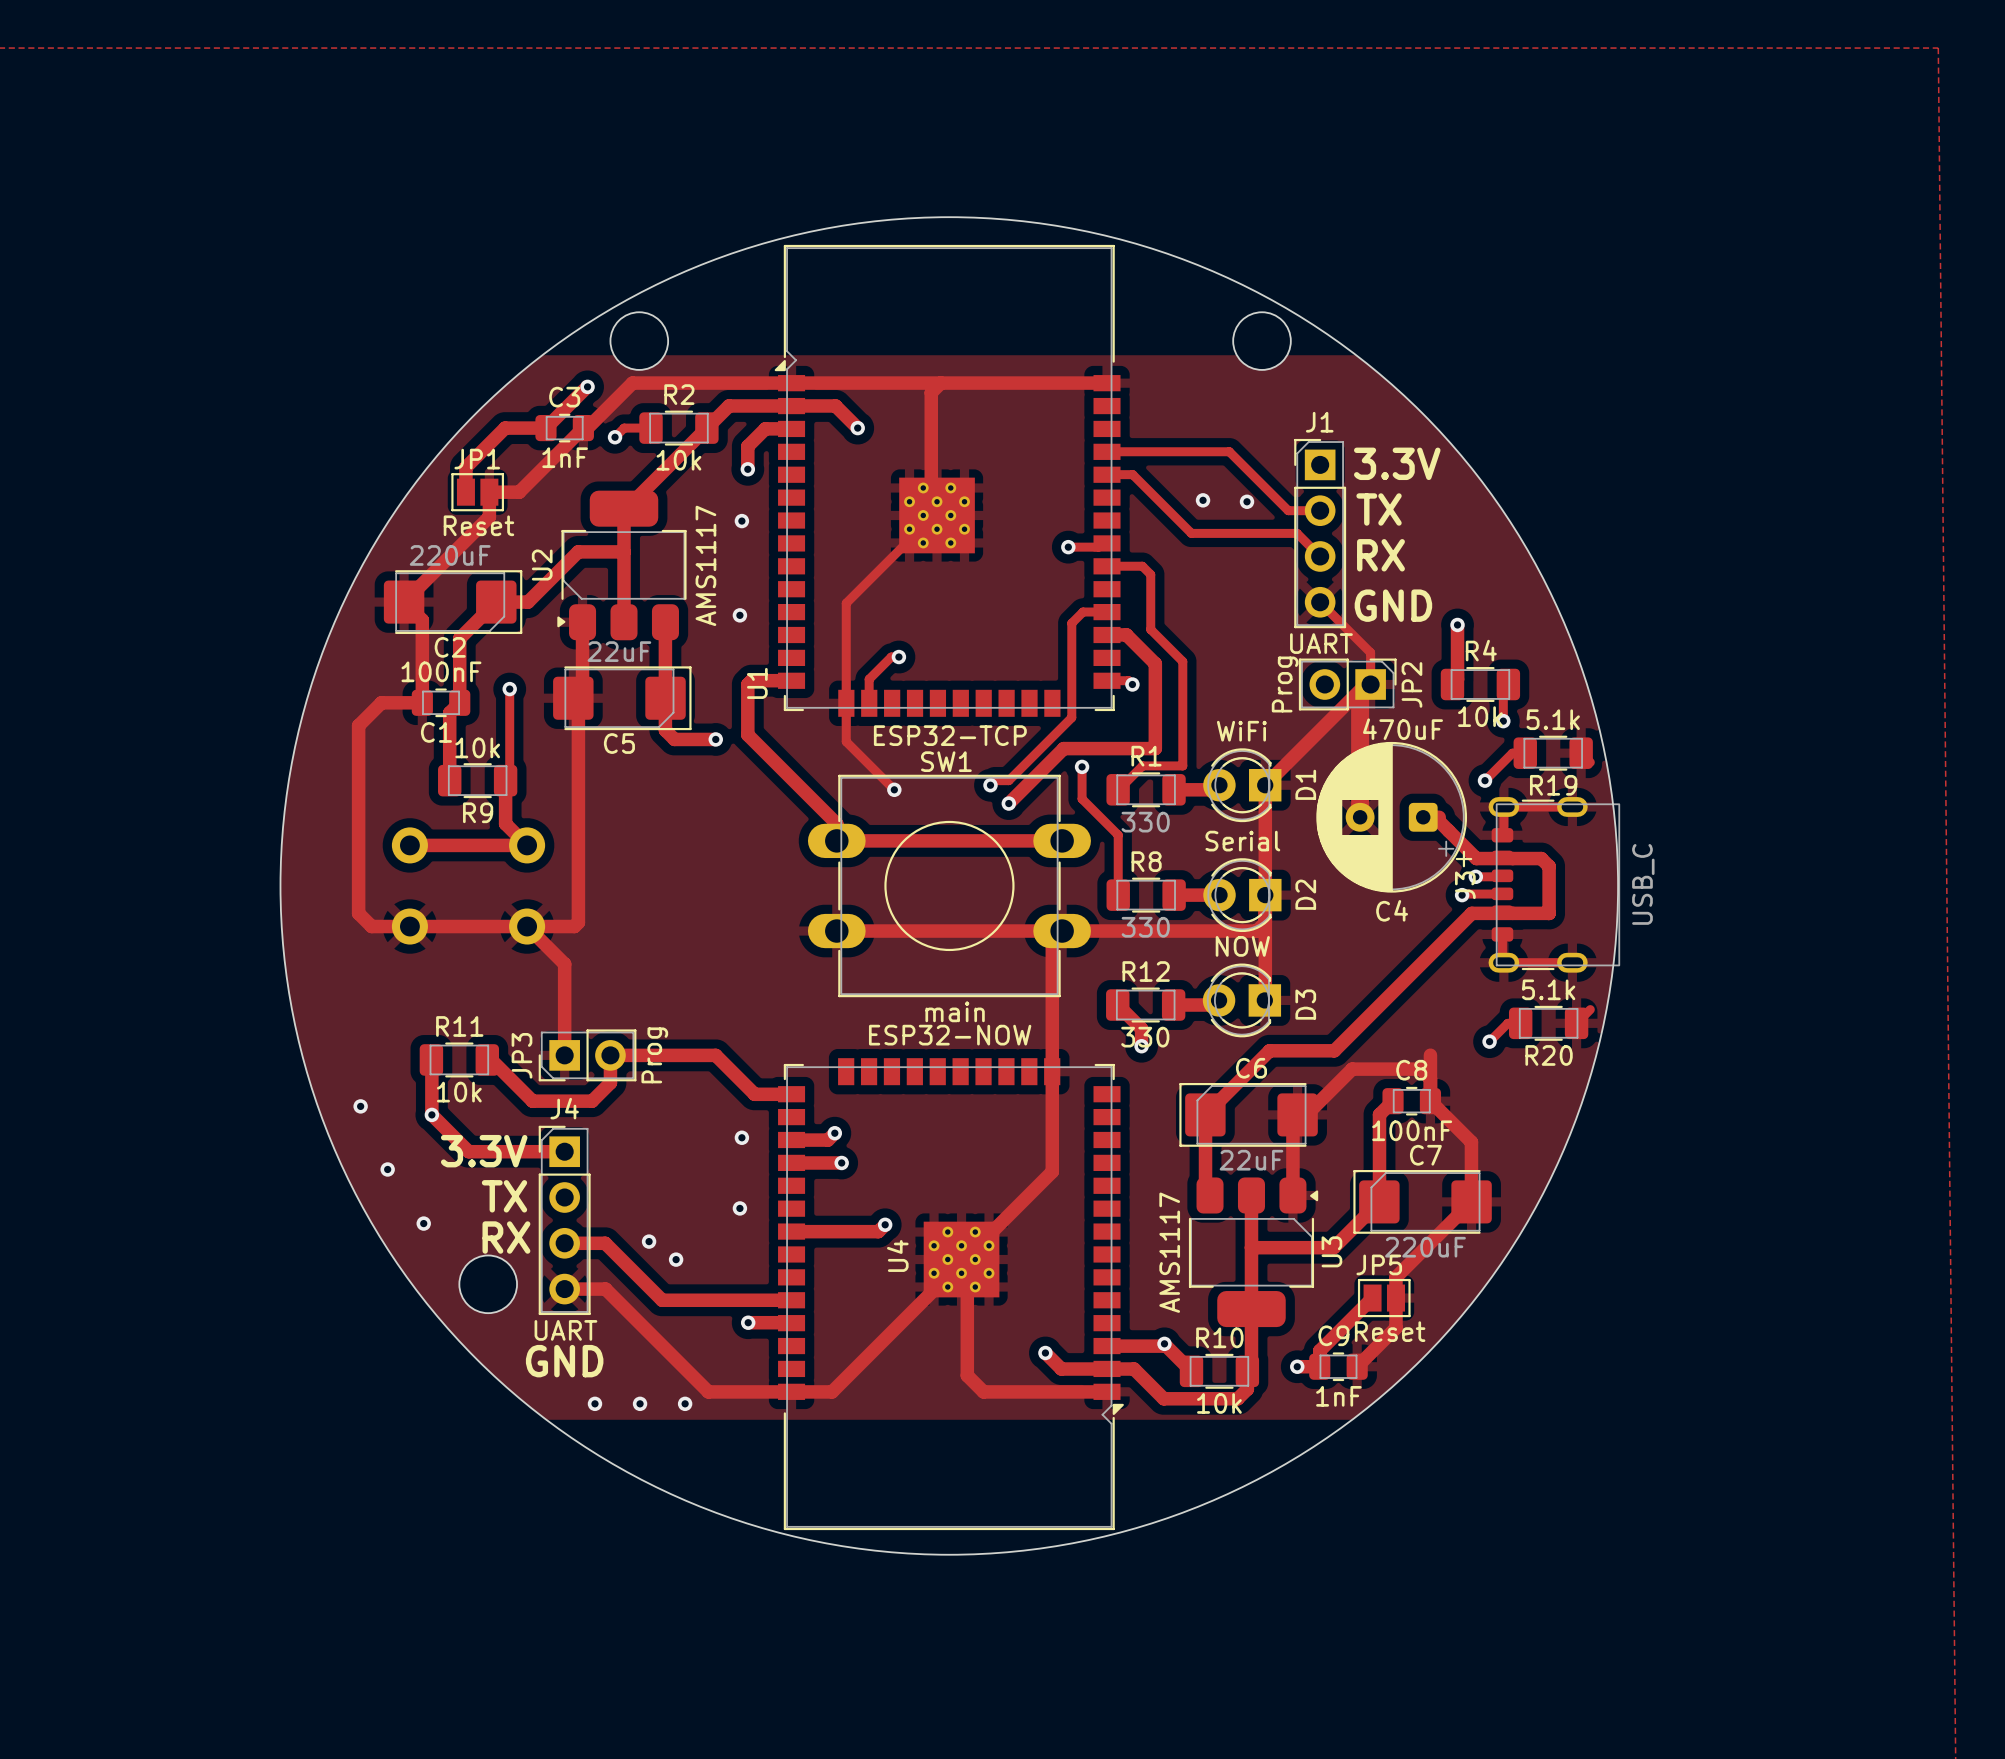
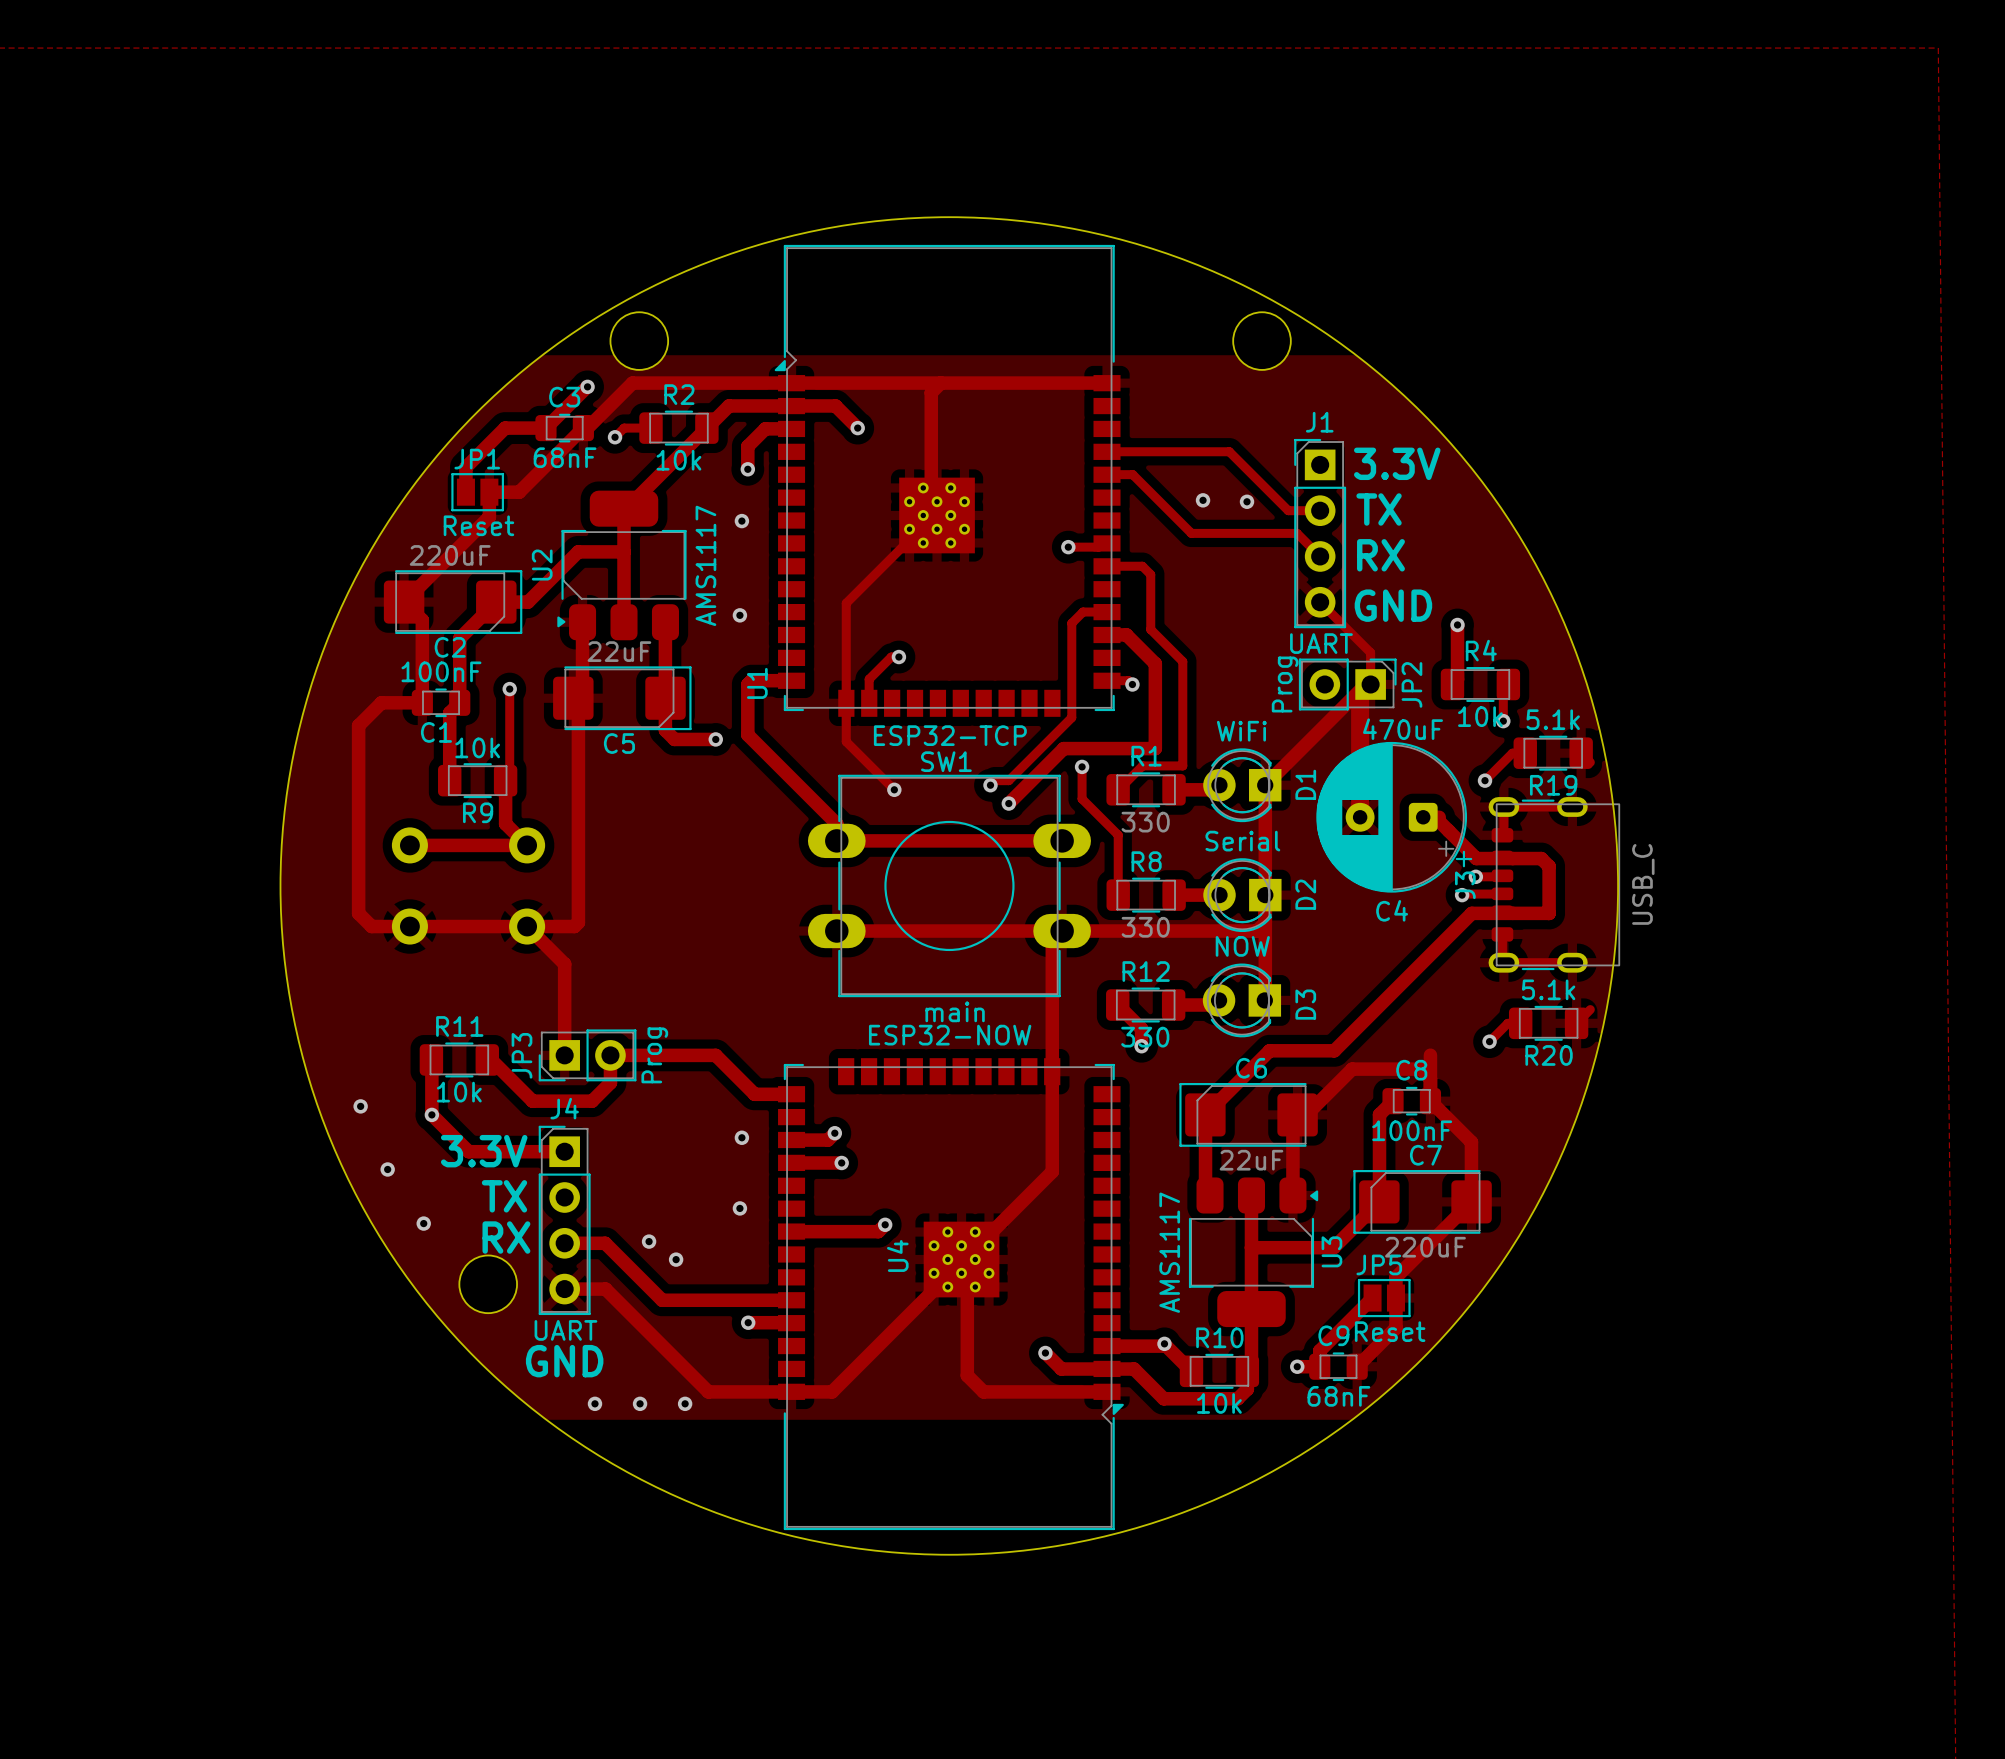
C3 value: 1nF (565, 457) -> 68nF (565, 457)
C9 value: 1nF (1338, 1396) -> 68nF (1338, 1396)

